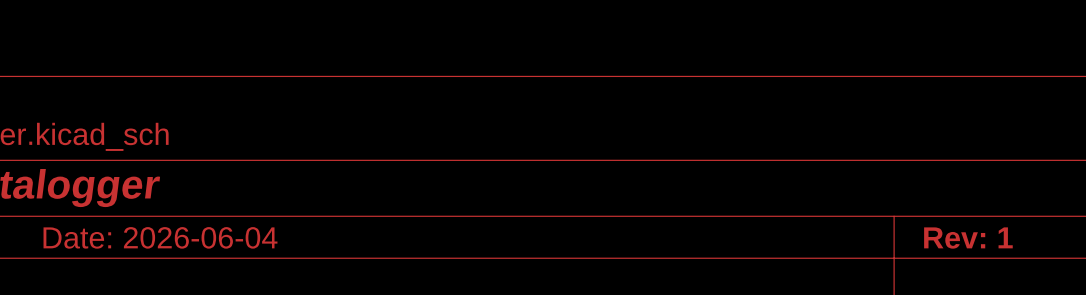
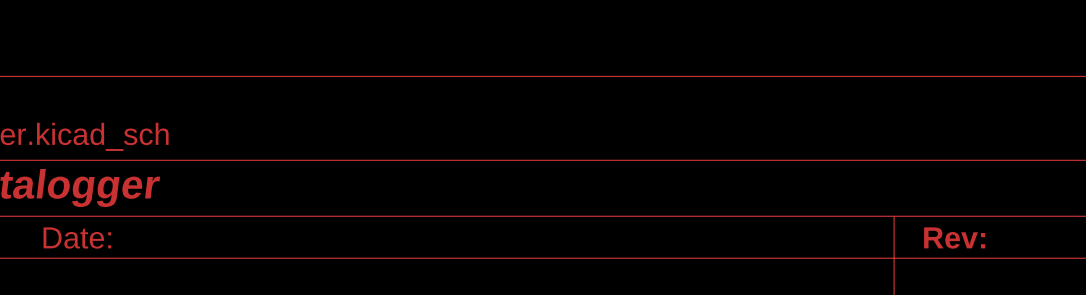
title block: Date: 2026-06-04 (160, 237) -> Date: (77, 238)
title block: Rev: 1 (968, 238) -> Rev: (954, 238)

